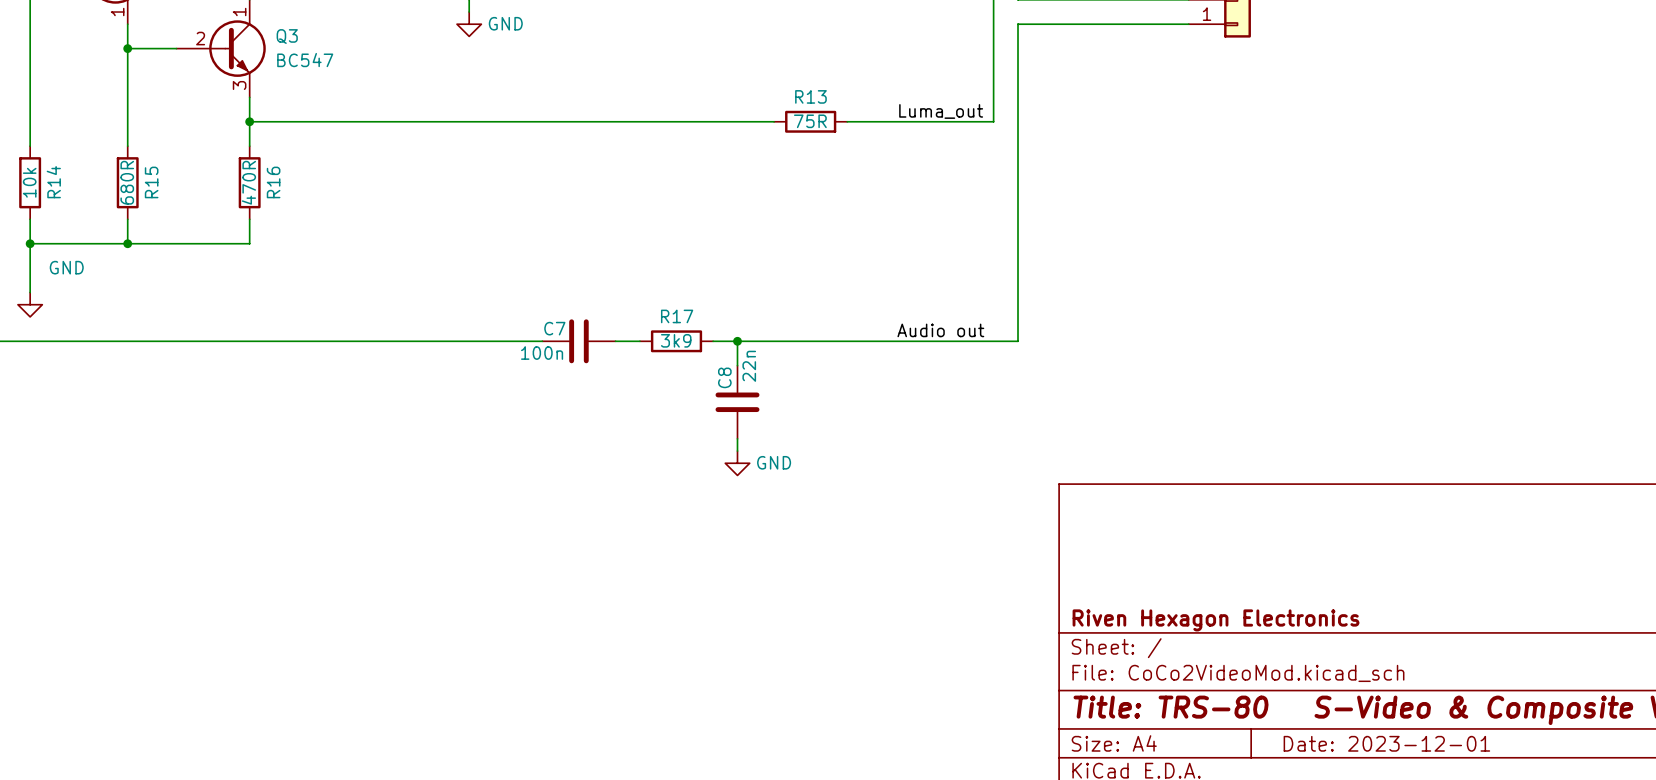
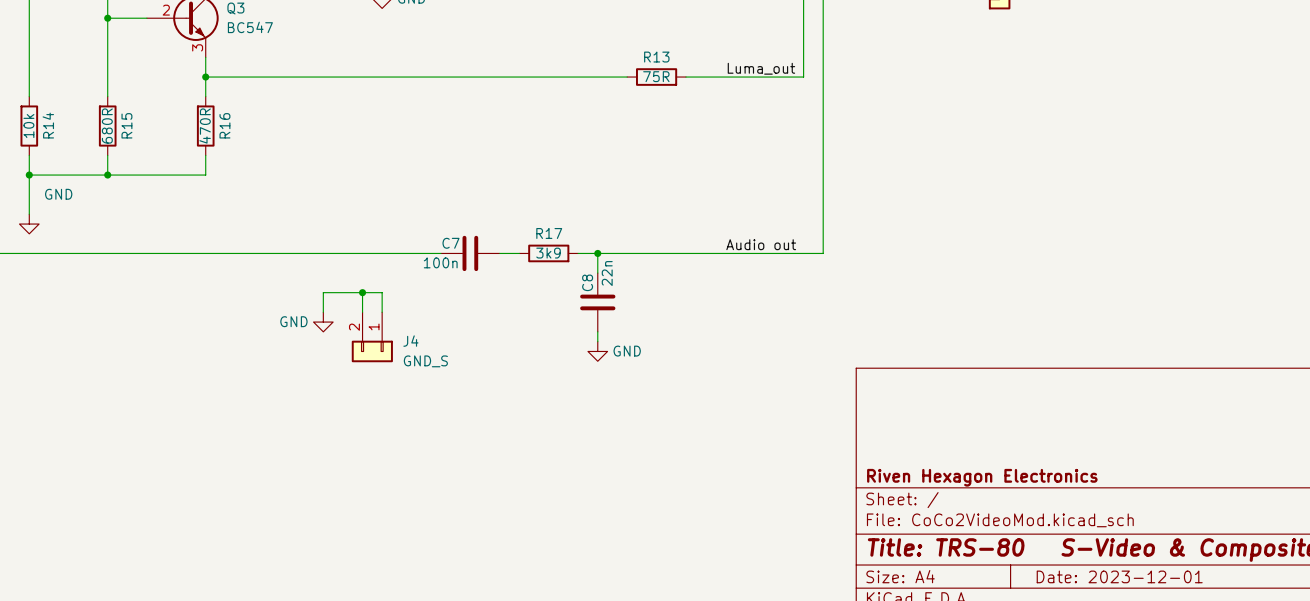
wire: none -> (362, 292) (362, 312)
junction: none -> (362, 292)
wire: none -> (323, 312) (323, 292) (382, 292) (382, 312)
power symbol: none -> GND (323, 322)
J4: none -> GND_S (372, 337)

